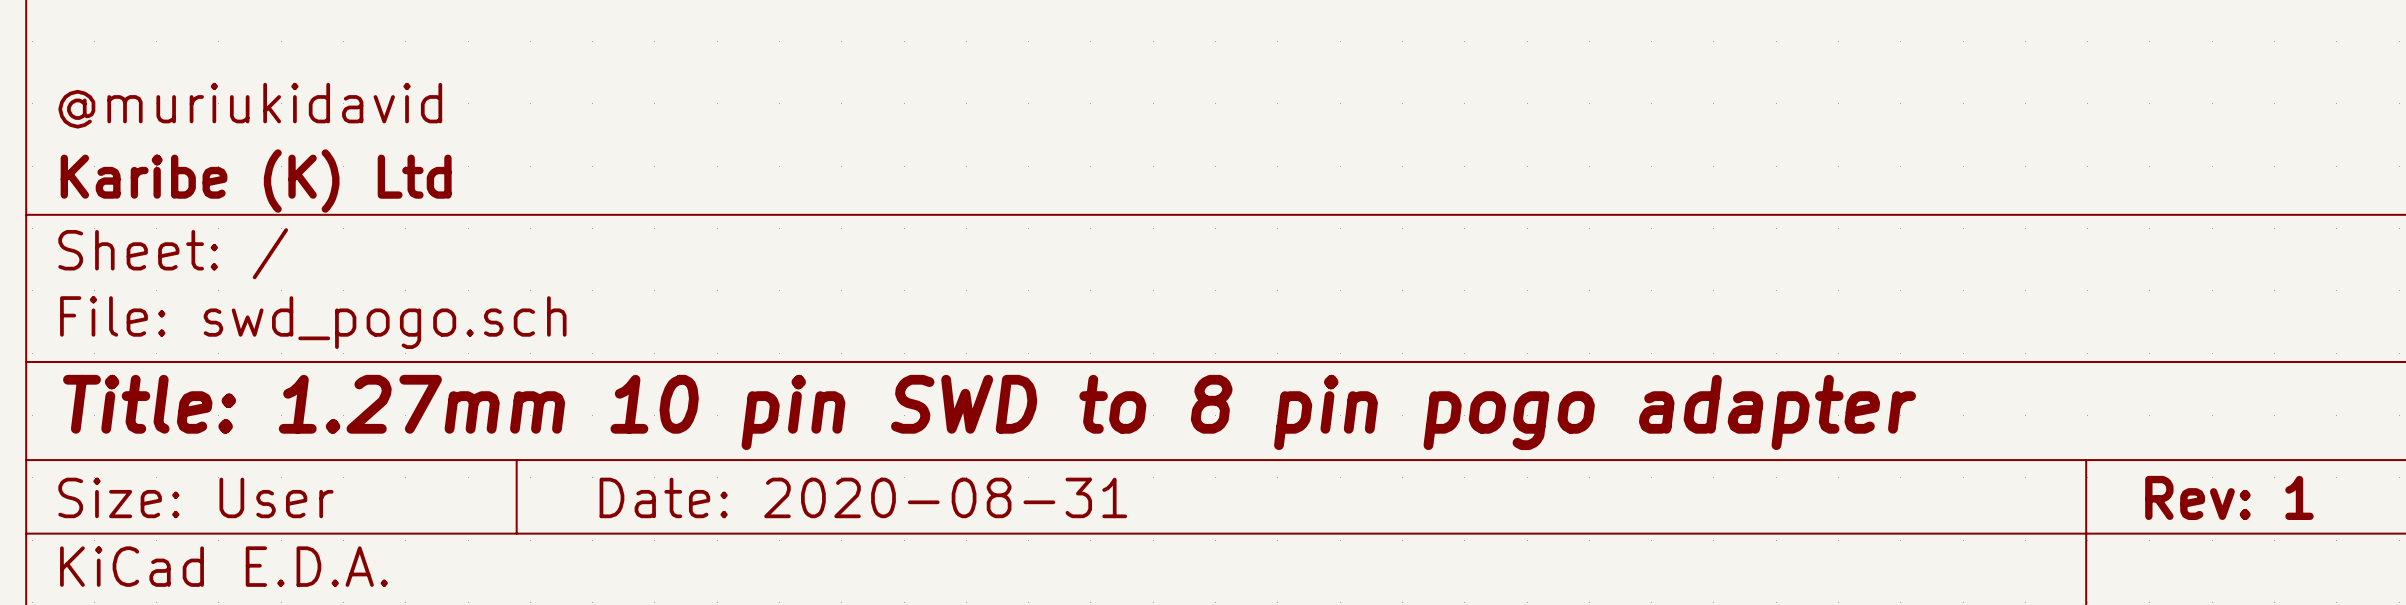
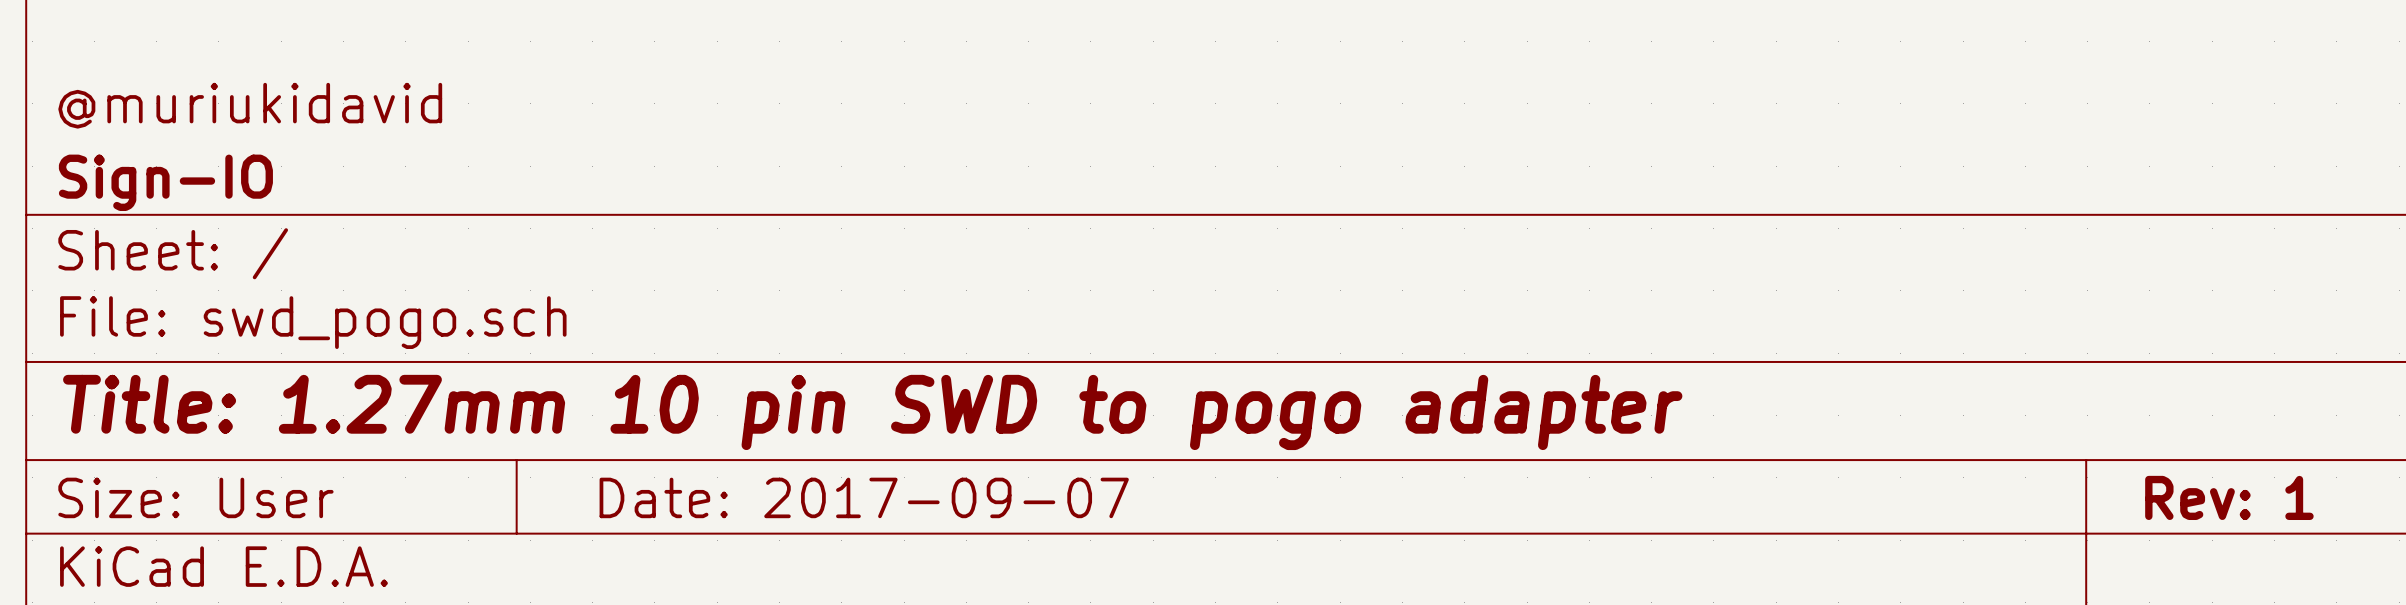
title block: Karibe (K) Ltd (256, 181) -> Sign-IO (165, 182)
title block: Title: 1.27mm 10 pin SWD to 8 pin pogo adapter (989, 412) -> Title: 1.27mm 10 pin SWD to pogo adapter (872, 412)
title block: Date: 2020-08-31 (863, 497) -> Date: 2017-09-07 (864, 497)

